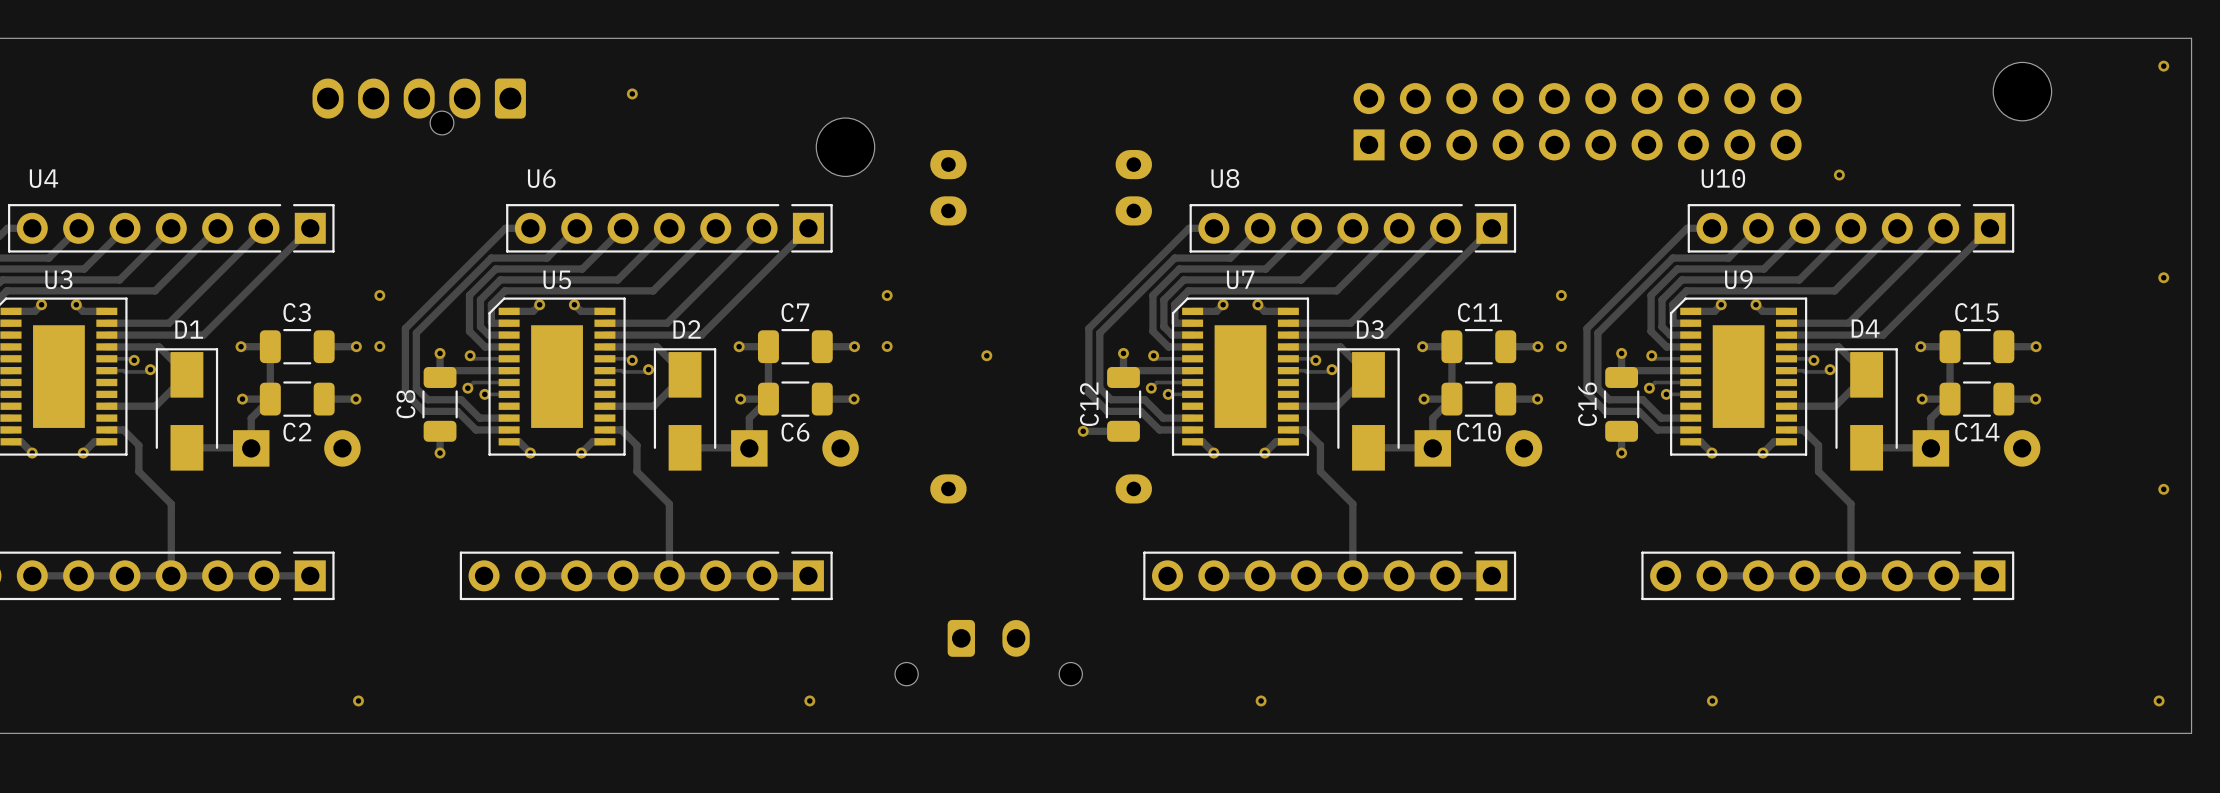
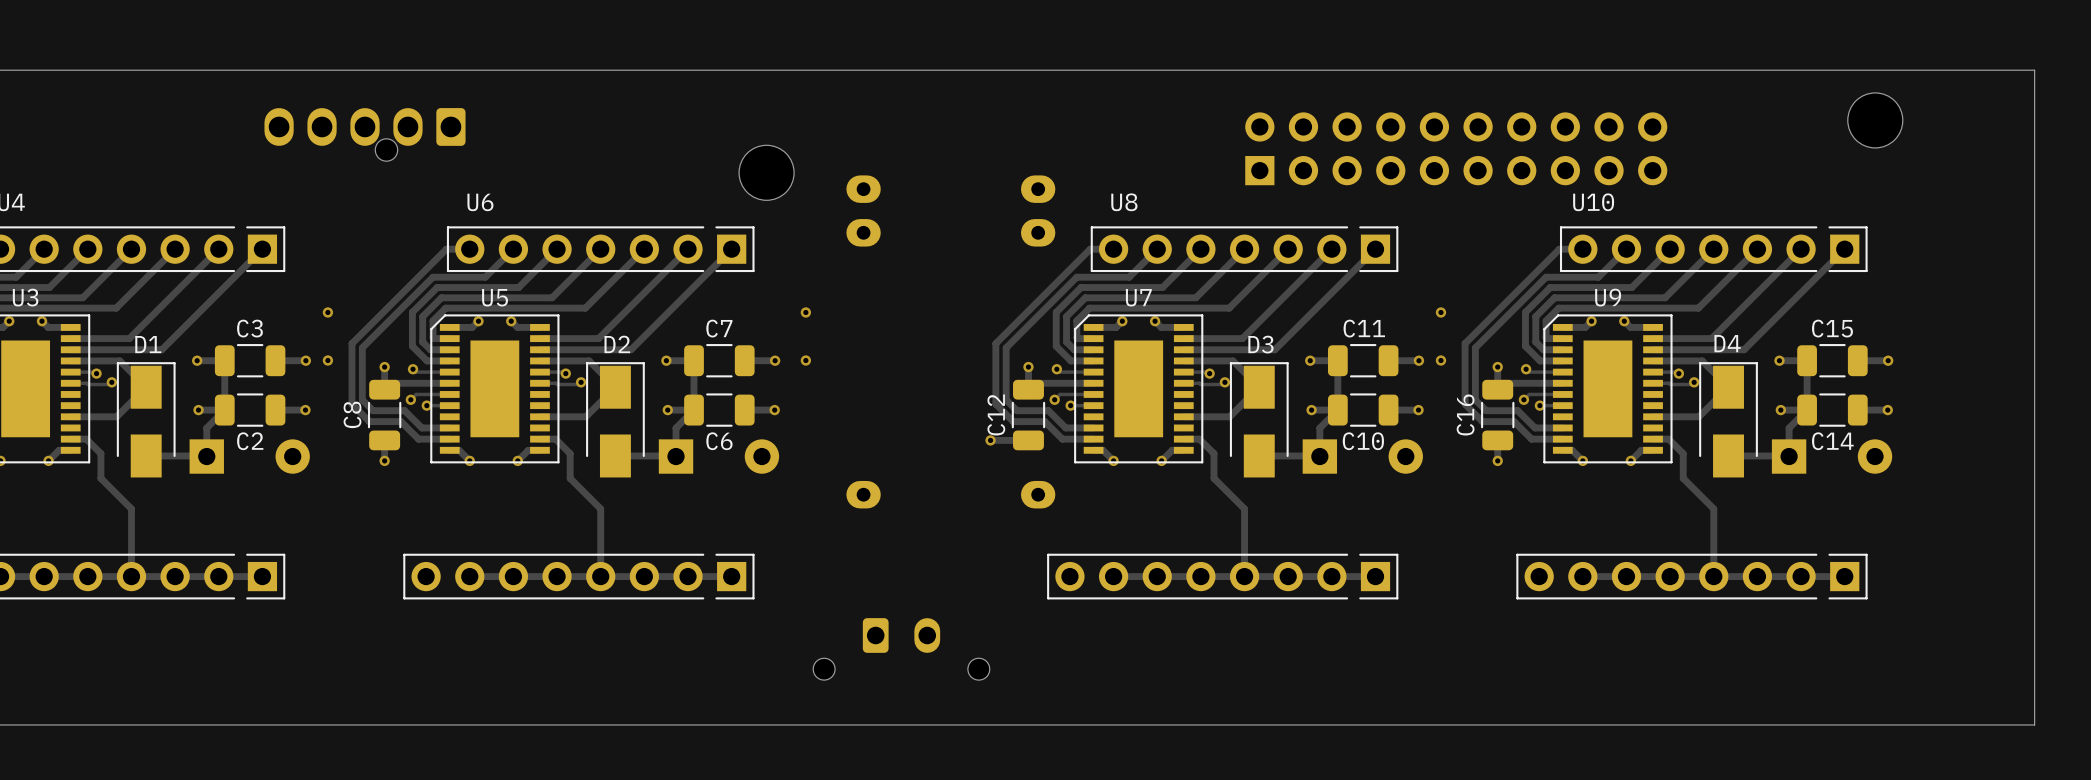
via: (2163, 66) -> none
via: (632, 93) -> none
via: (1839, 175) -> none
via: (2163, 277) -> none
via: (986, 355) -> none
via: (2163, 489) -> none
via: (358, 700) -> none
via: (809, 700) -> none
via: (1261, 700) -> none
via: (1712, 700) -> none
via: (2159, 700) -> none

